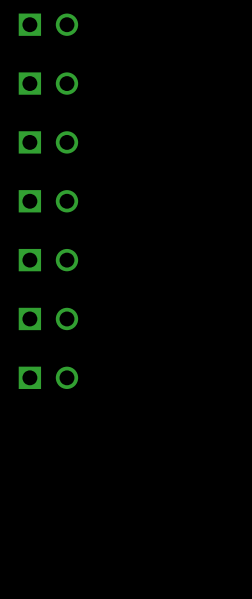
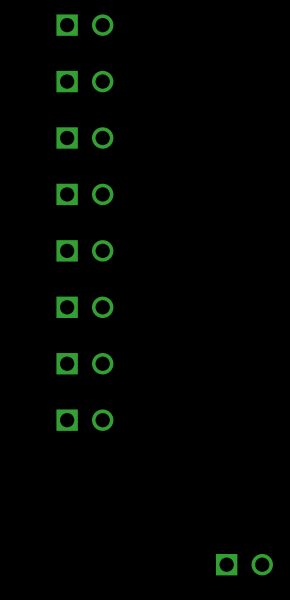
part: none -> (244, 564)

